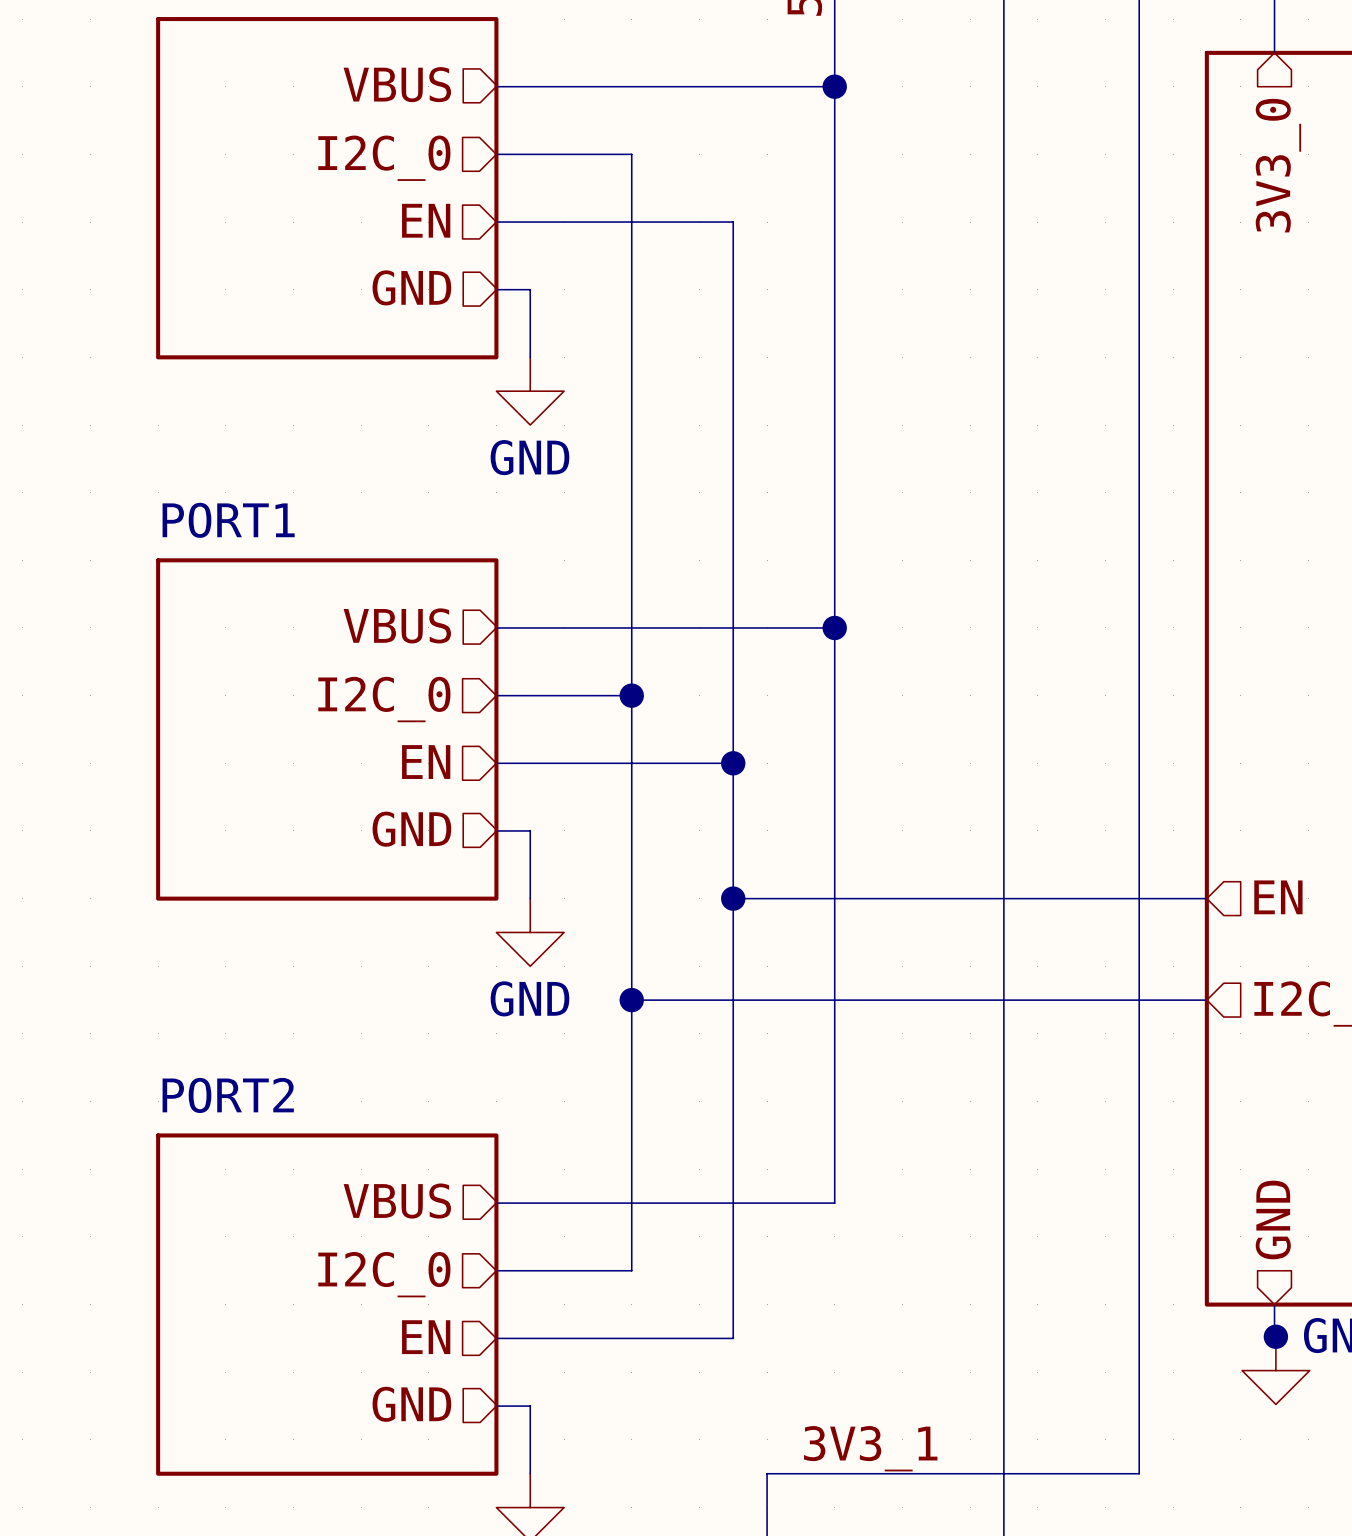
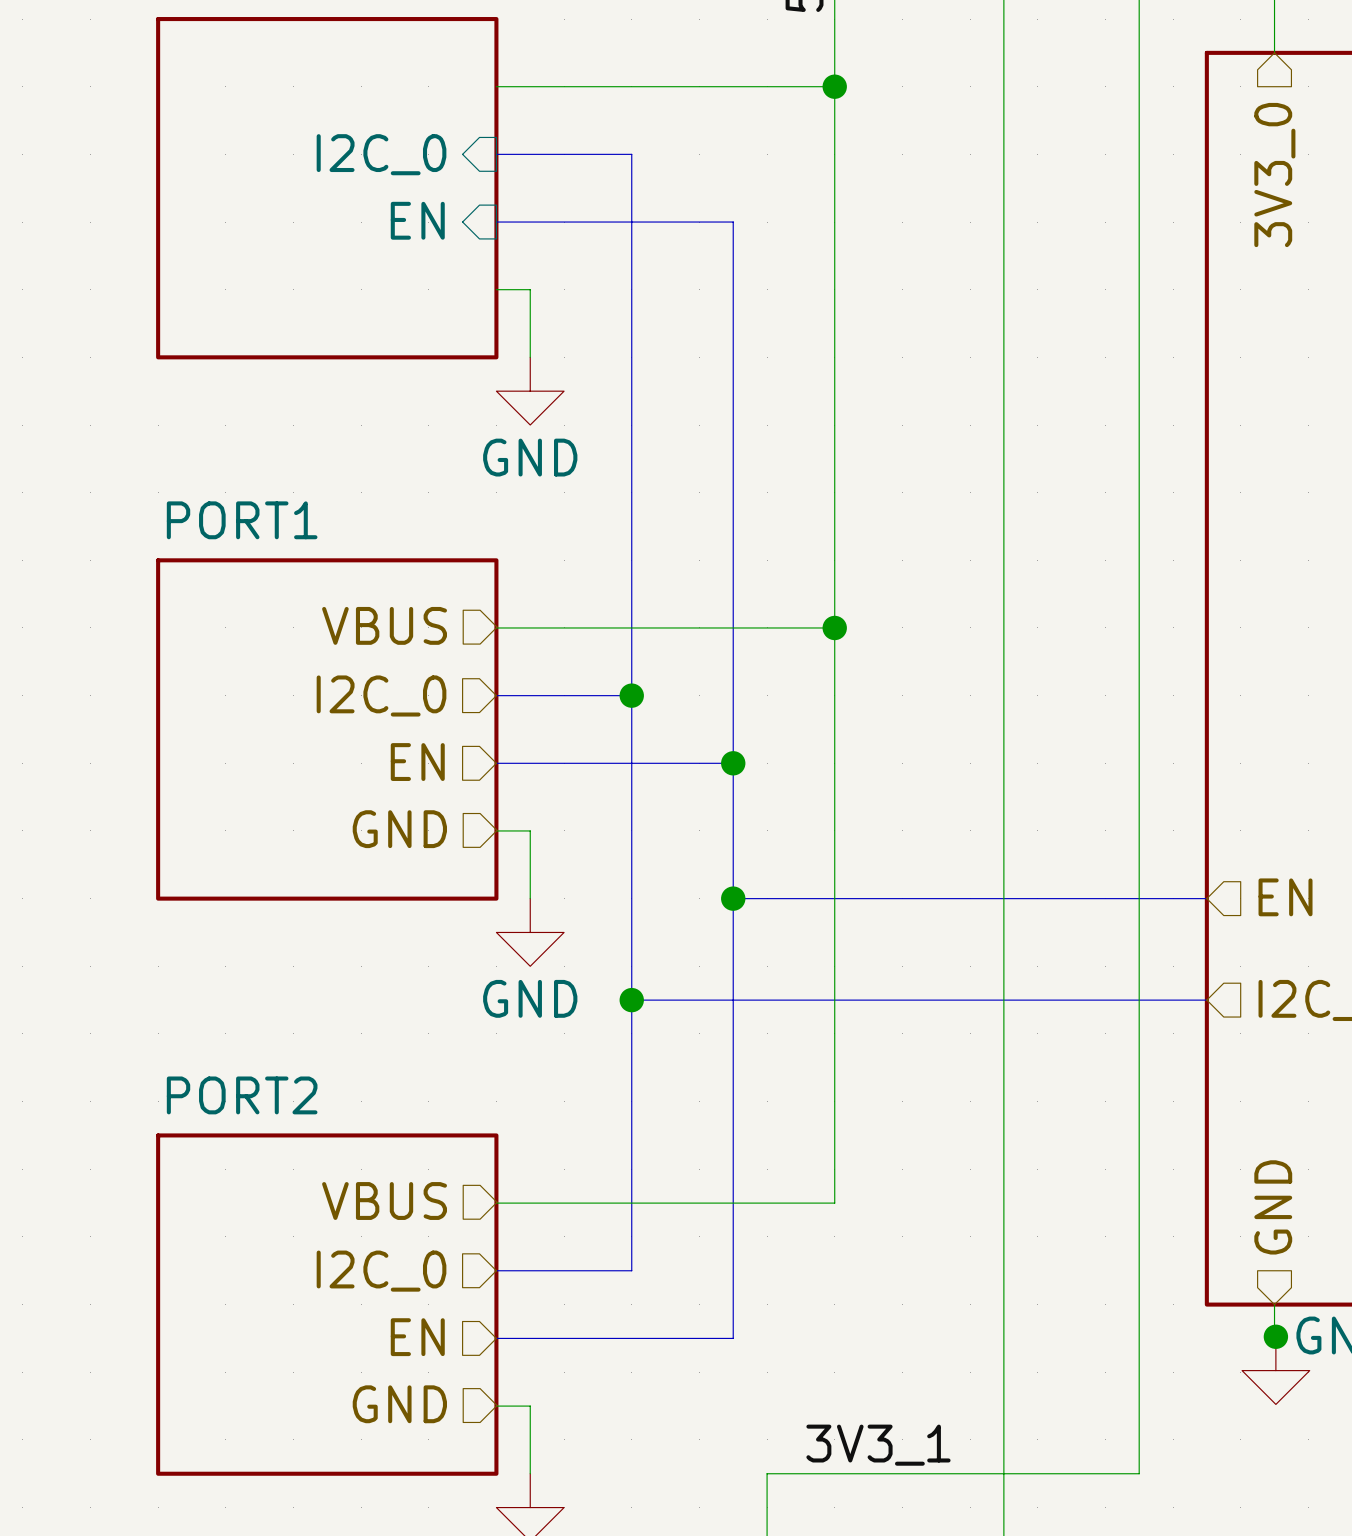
hierarchical label: VBUS (397, 84) -> none
hierarchical label: I2C_0 (384, 158) -> none
sheet pin: none -> I2C_0 (381, 154)
hierarchical label: EN (426, 220) -> none
sheet pin: none -> EN (417, 220)
hierarchical label: GND (411, 287) -> none

